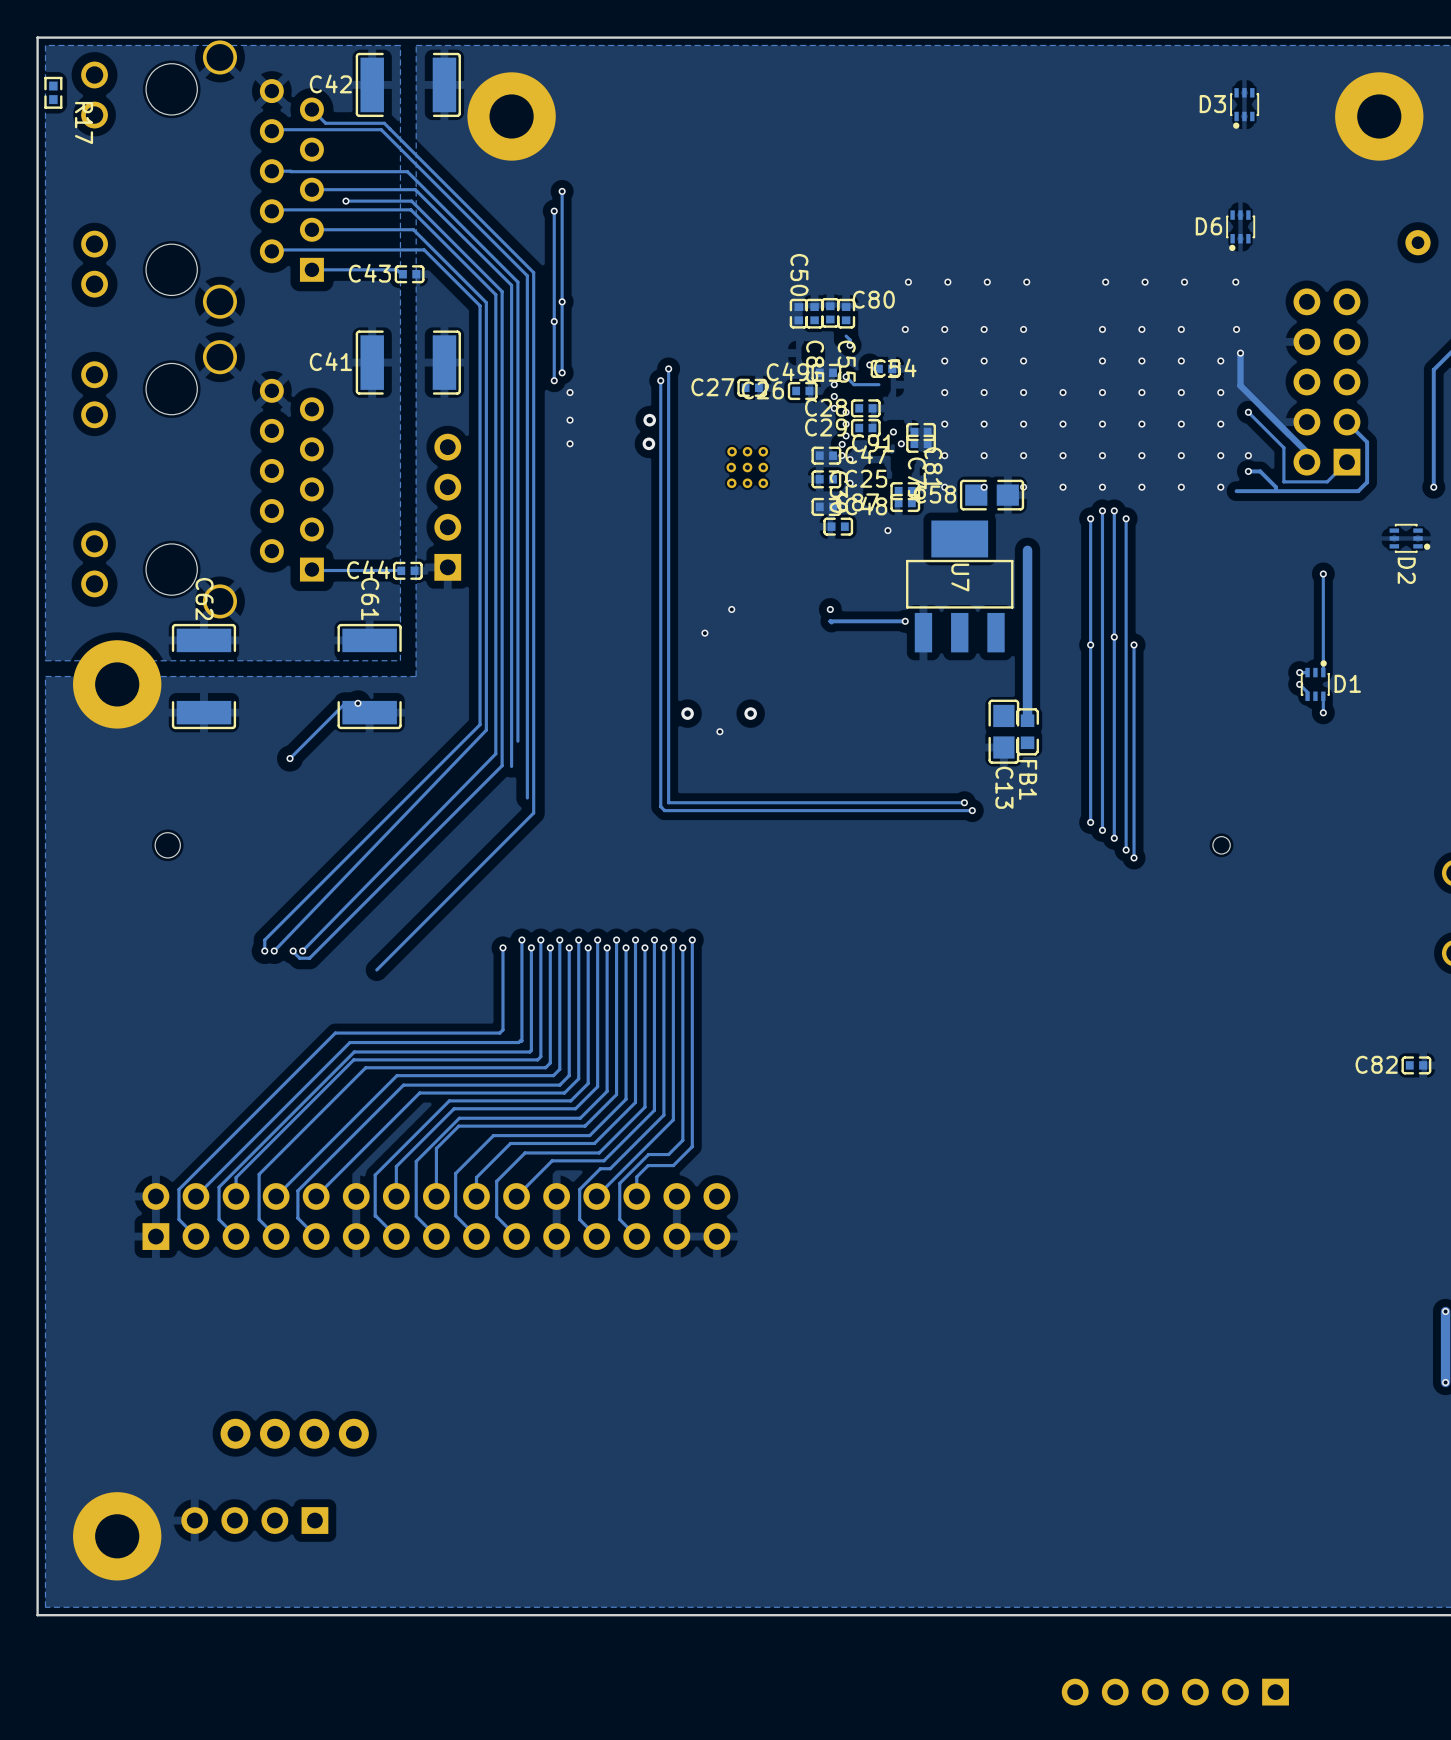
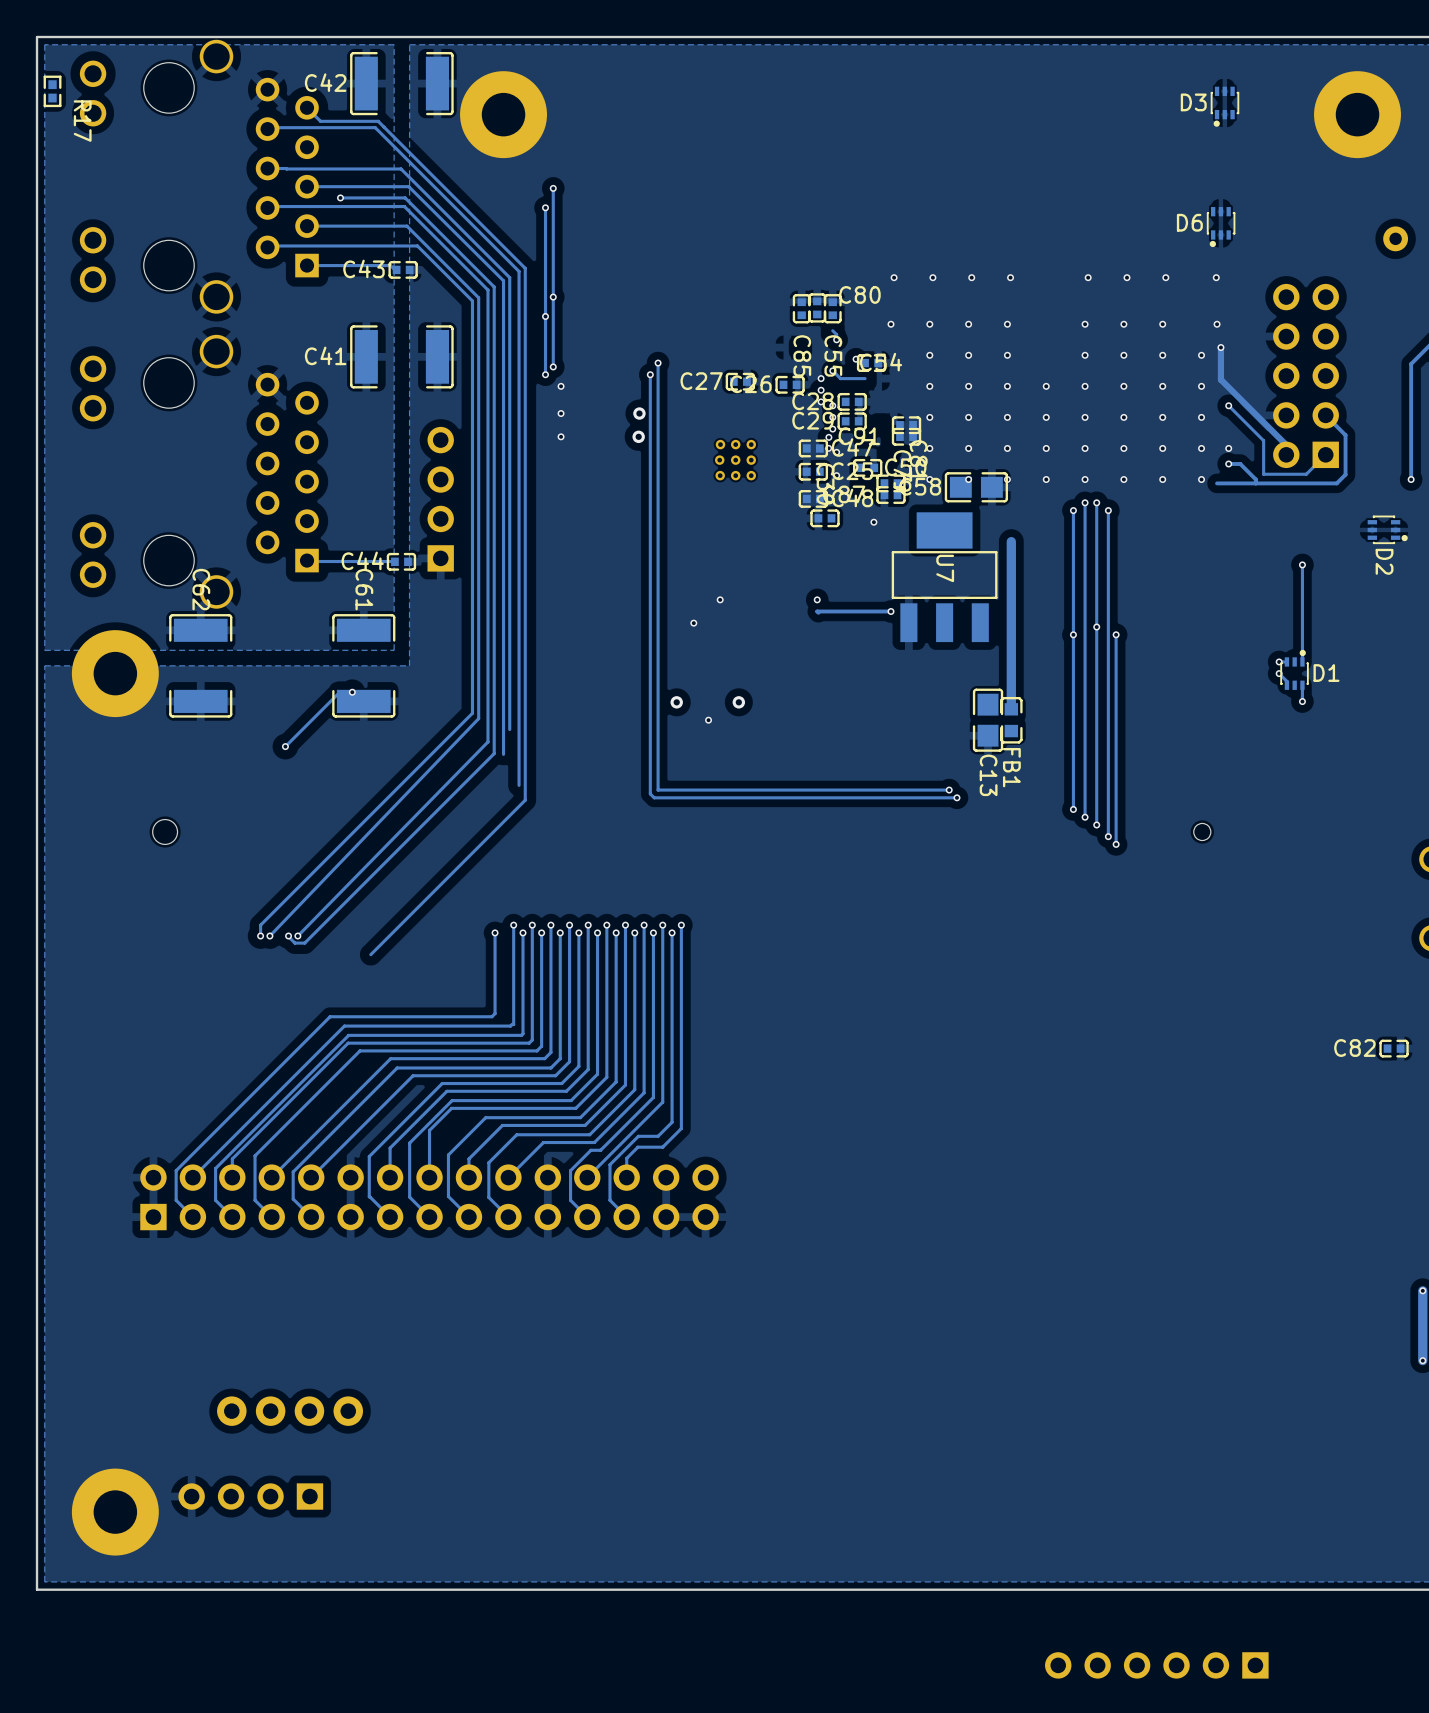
C50 rotation: 0° (798, 313) -> 90° clockwise (867, 467)
C50 position: (798, 313) -> (867, 467)
C49: (826, 372) -> none
via: (893, 431) -> none
via: (901, 443) -> none

